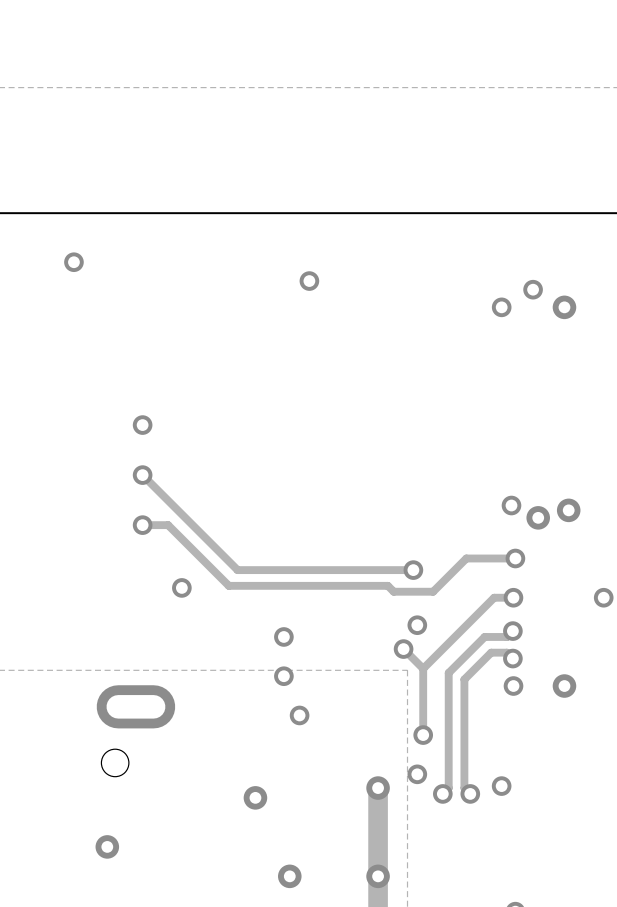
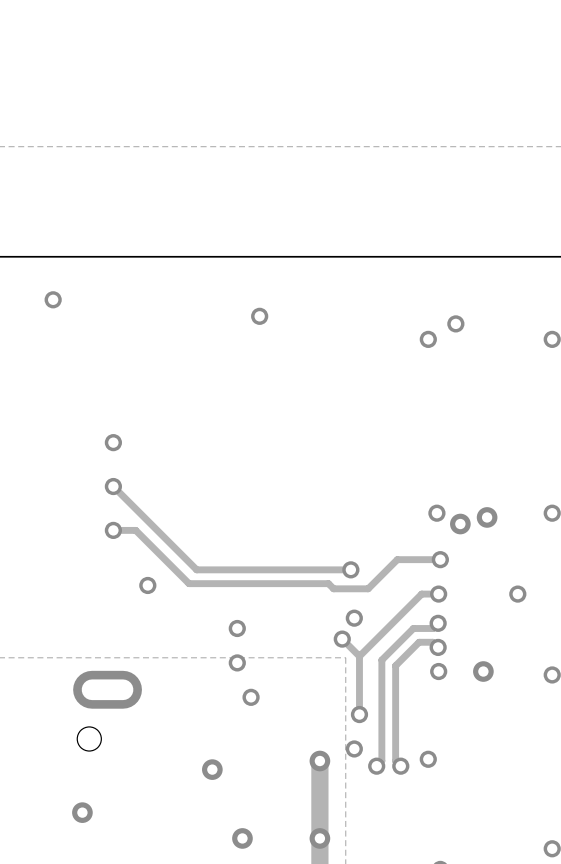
via: (564, 307) -> none

